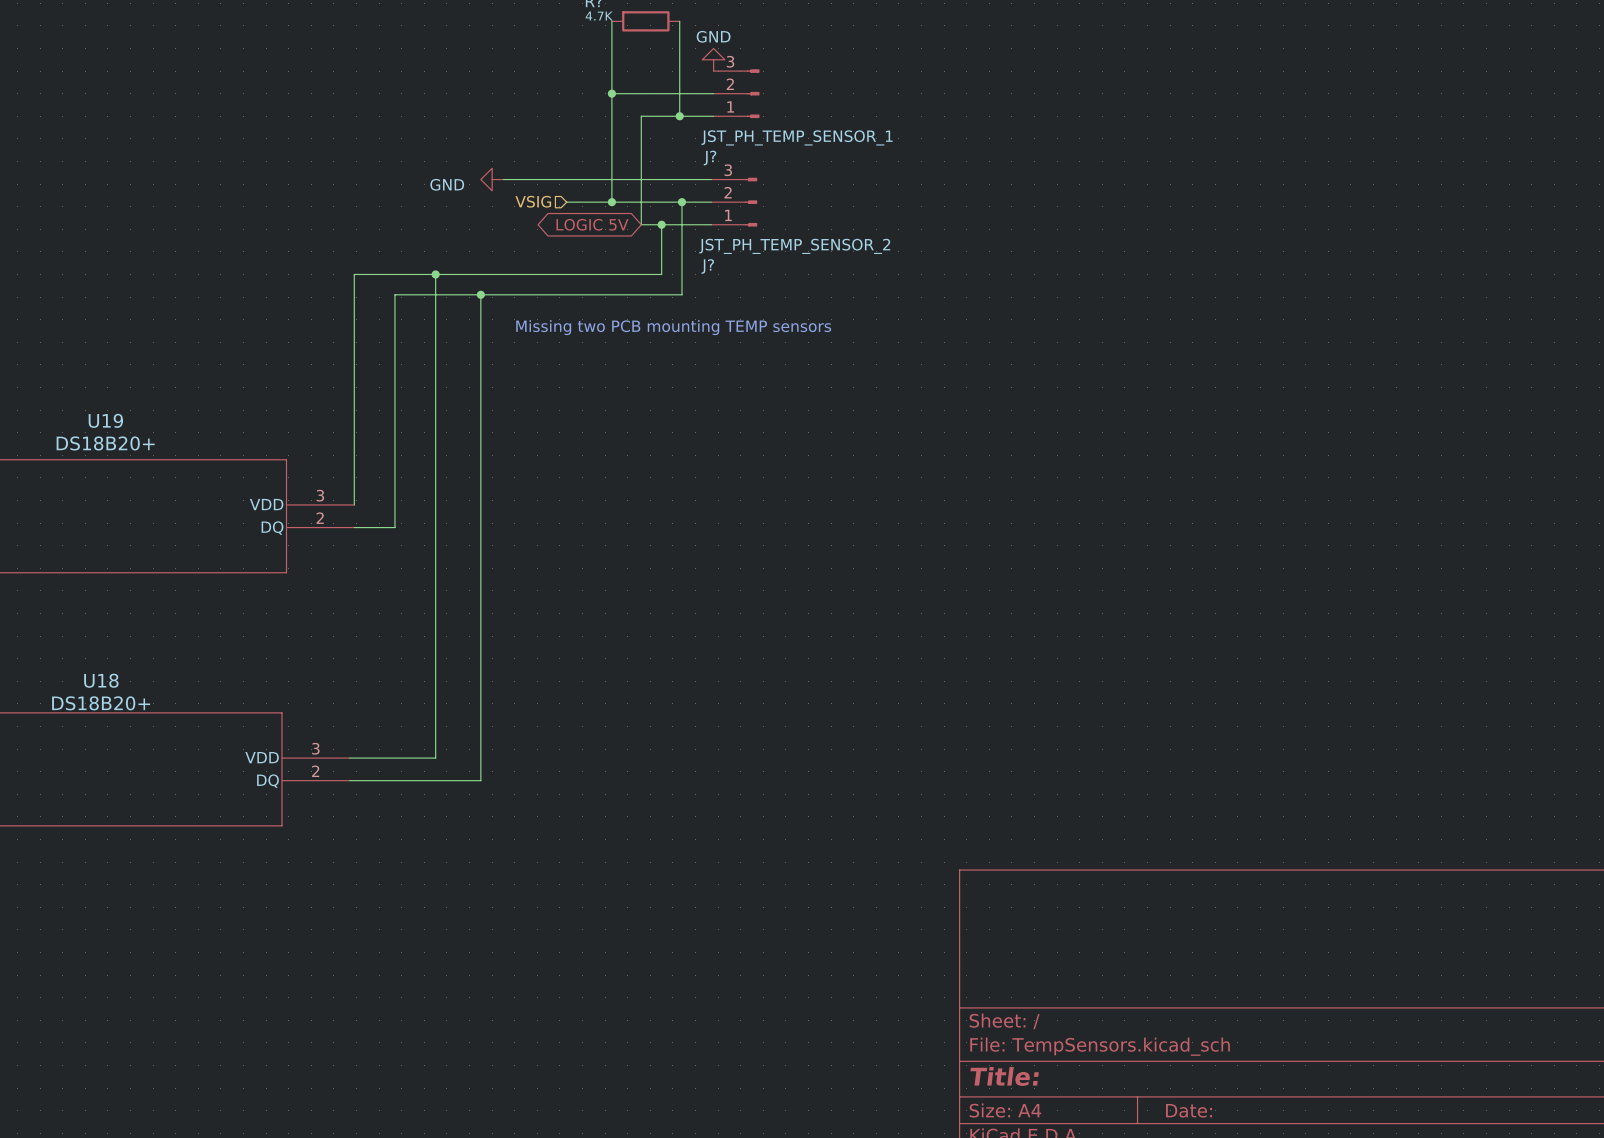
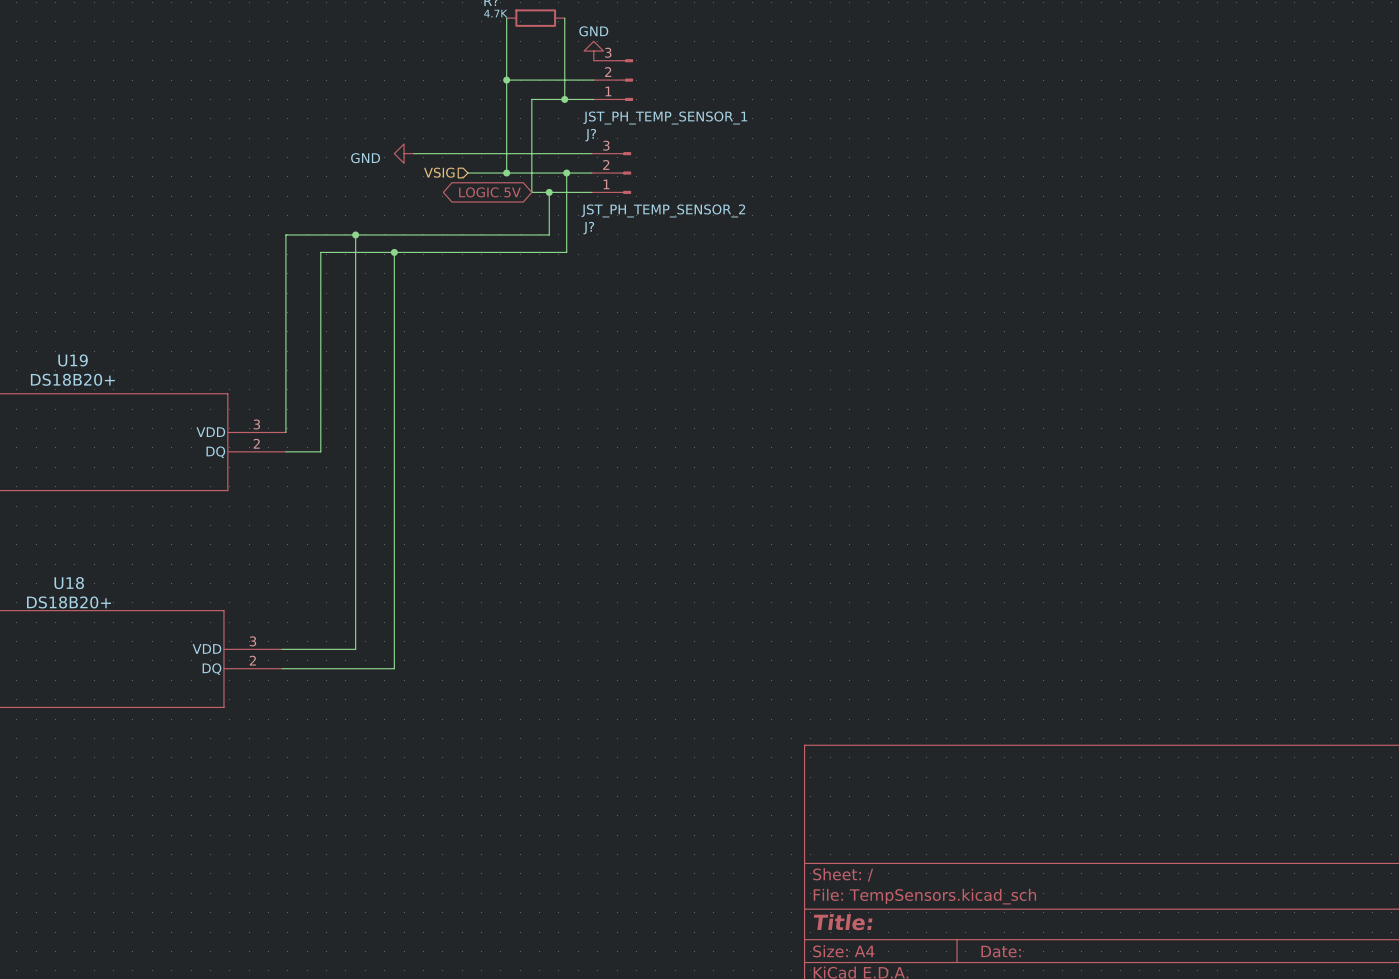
text: Missing two PCB mounting TEMP sensors (673, 327) -> none

